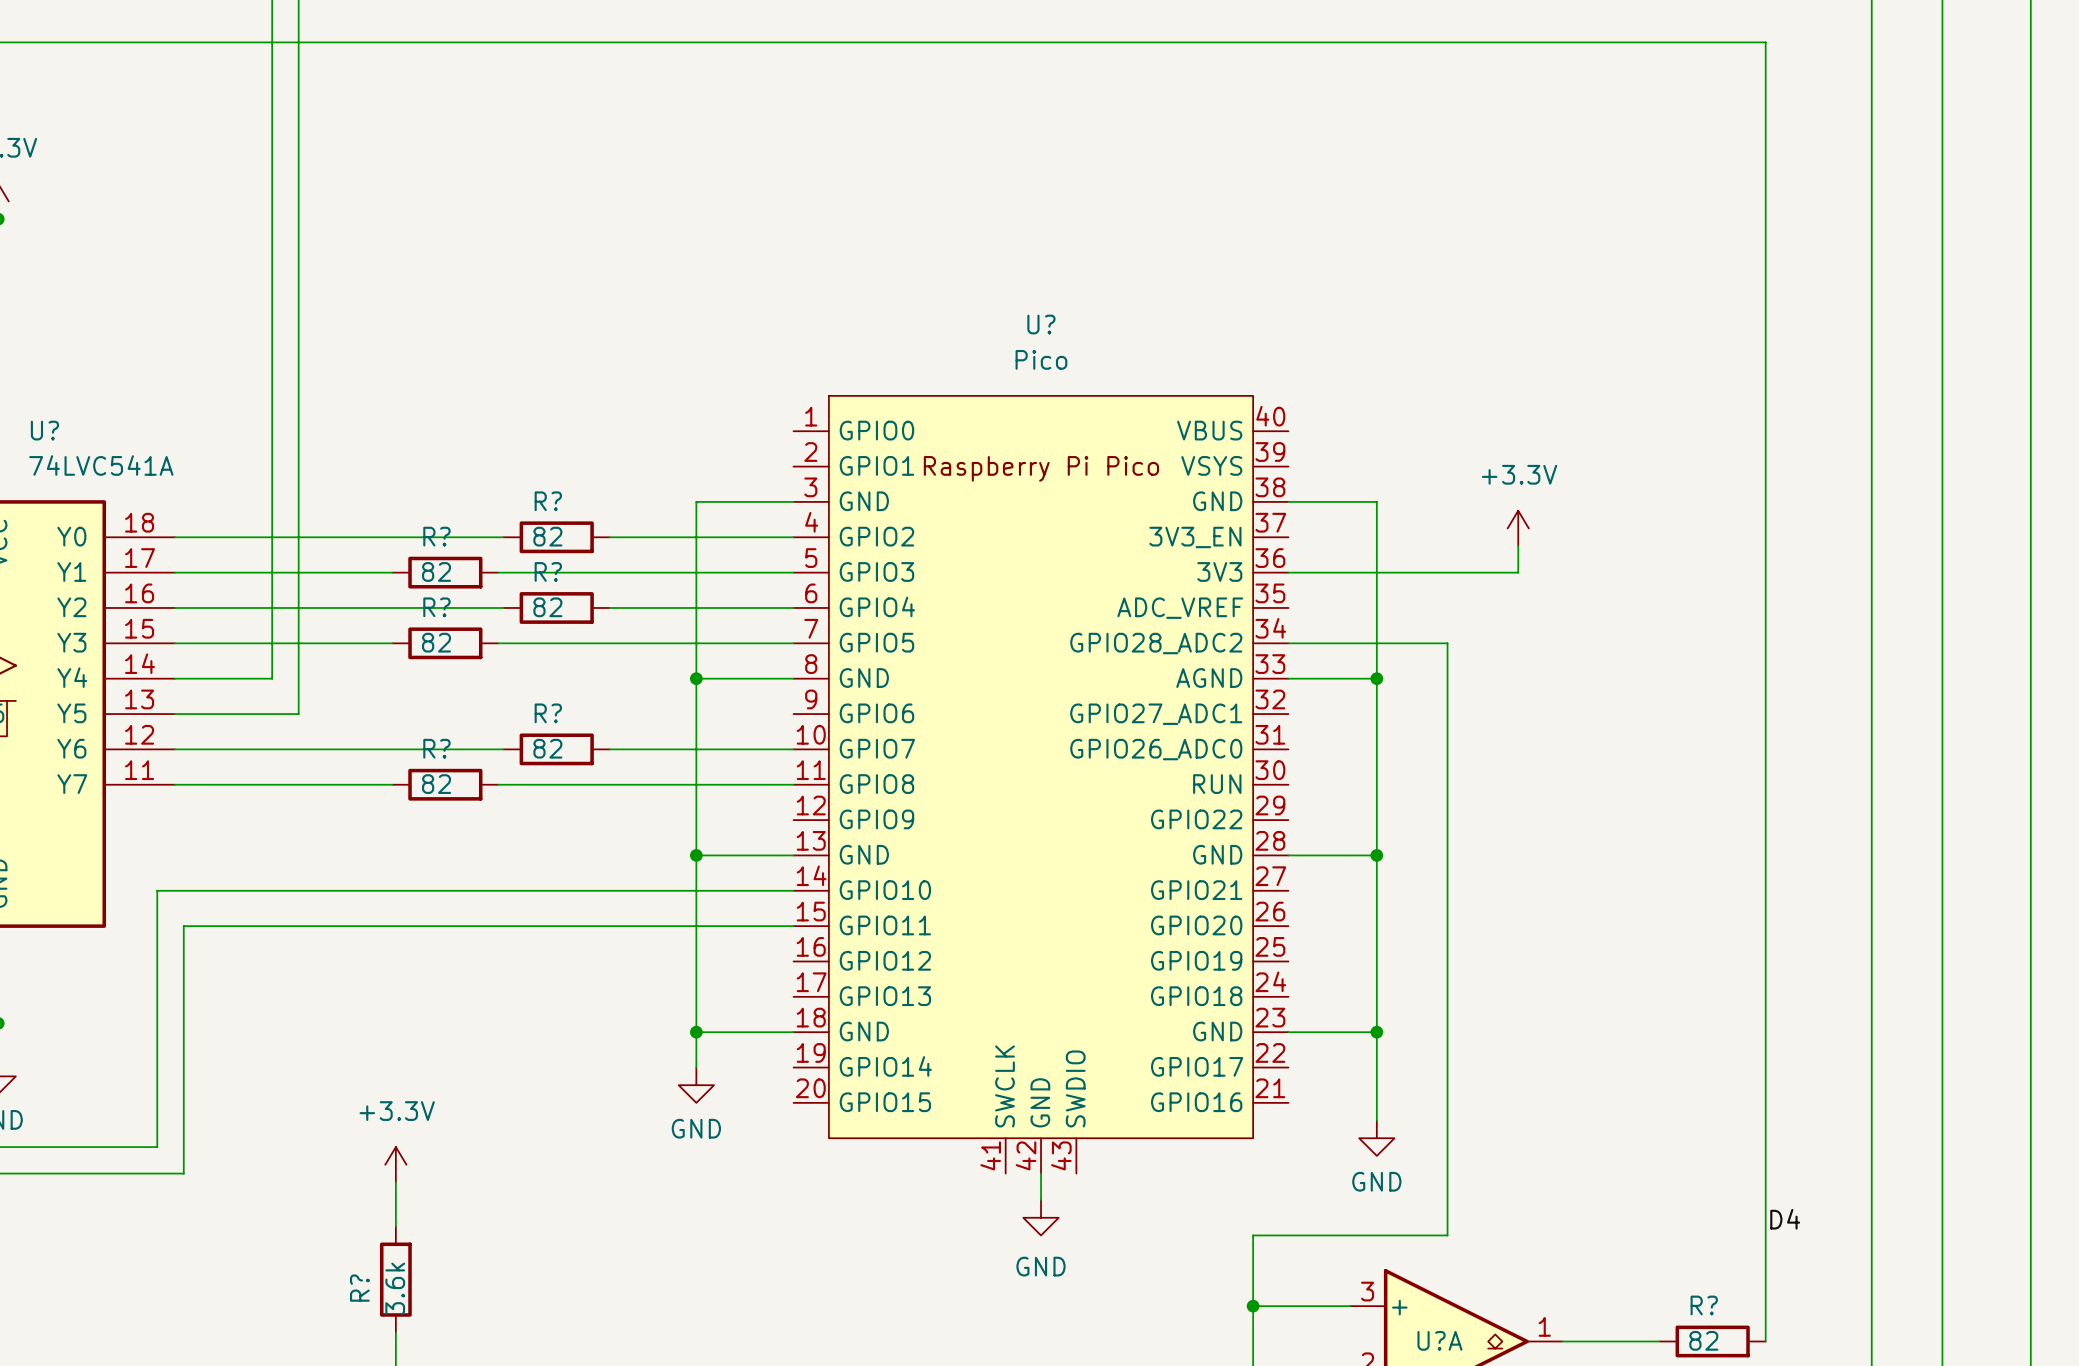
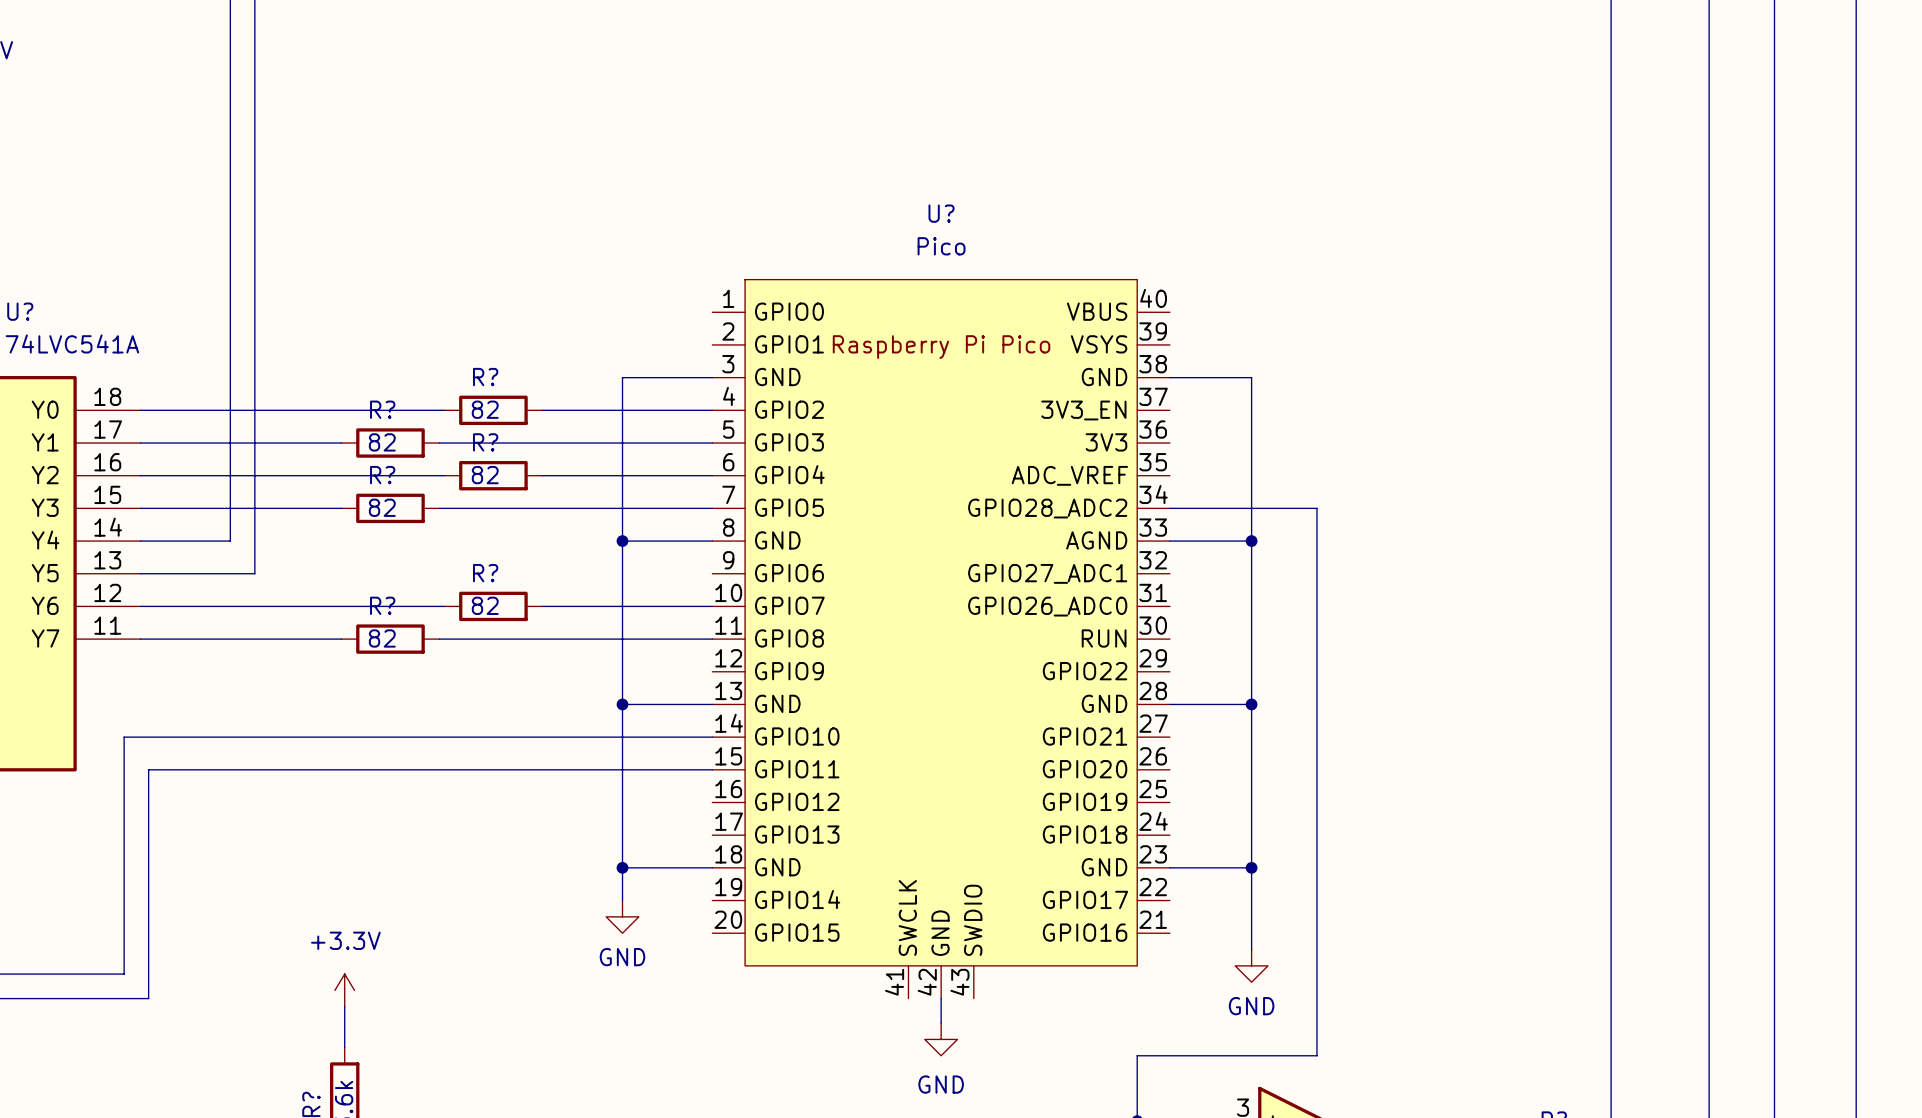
power symbol: +3.3V (1518, 528) -> none
wire: (1518, 546) (1518, 572) (1288, 572) -> none
label: D4 (1785, 1219) -> none

